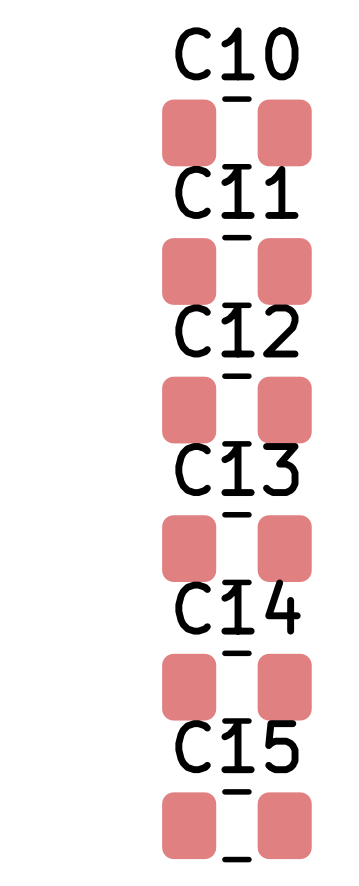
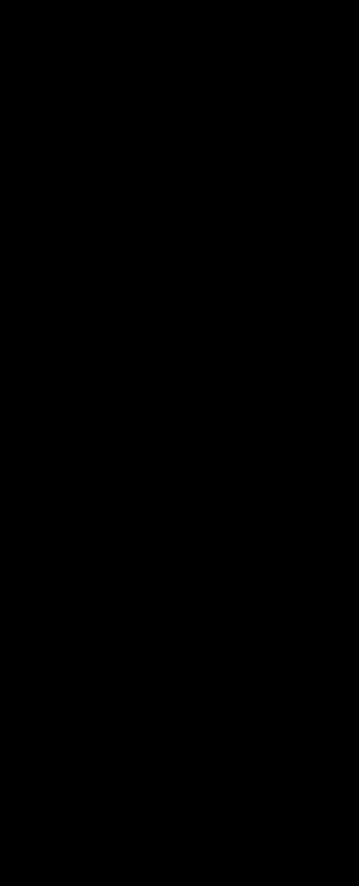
C10: (236, 132) -> none
C11: (236, 271) -> none
C12: (236, 410) -> none
C13: (236, 548) -> none
C14: (236, 687) -> none
C15: (236, 825) -> none

